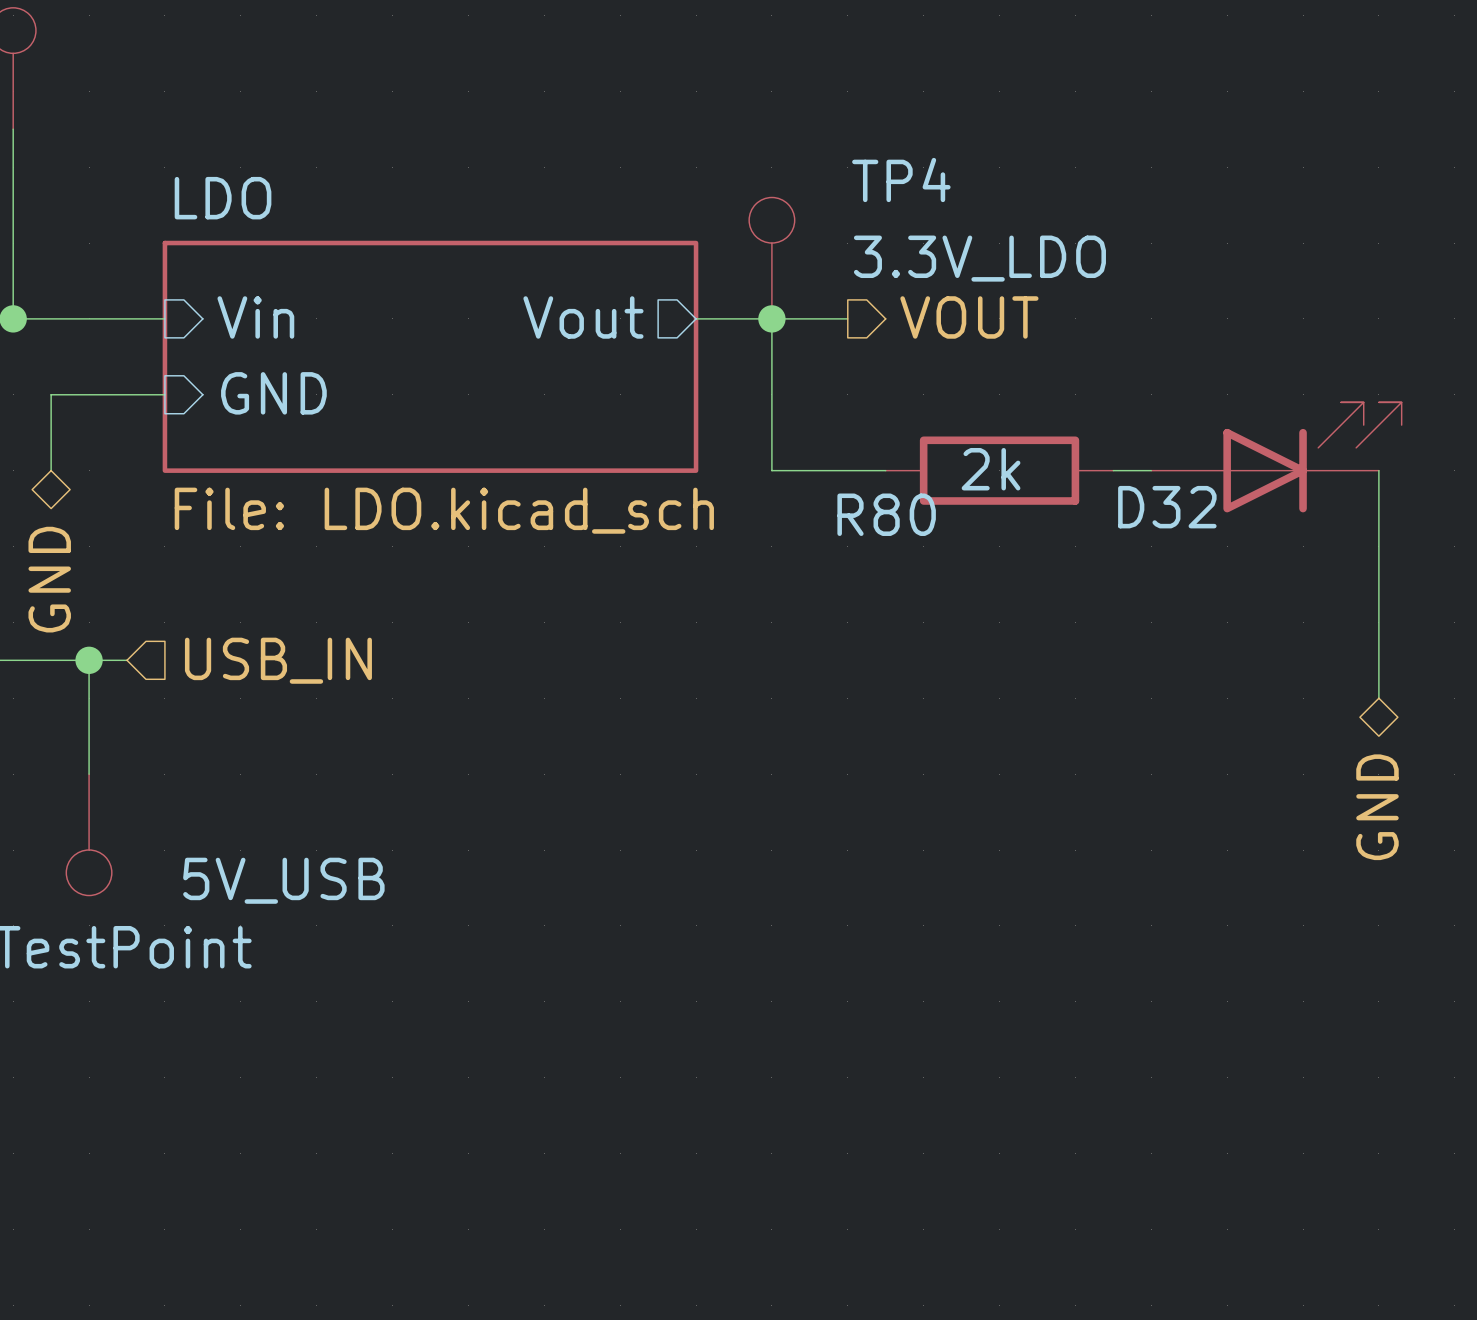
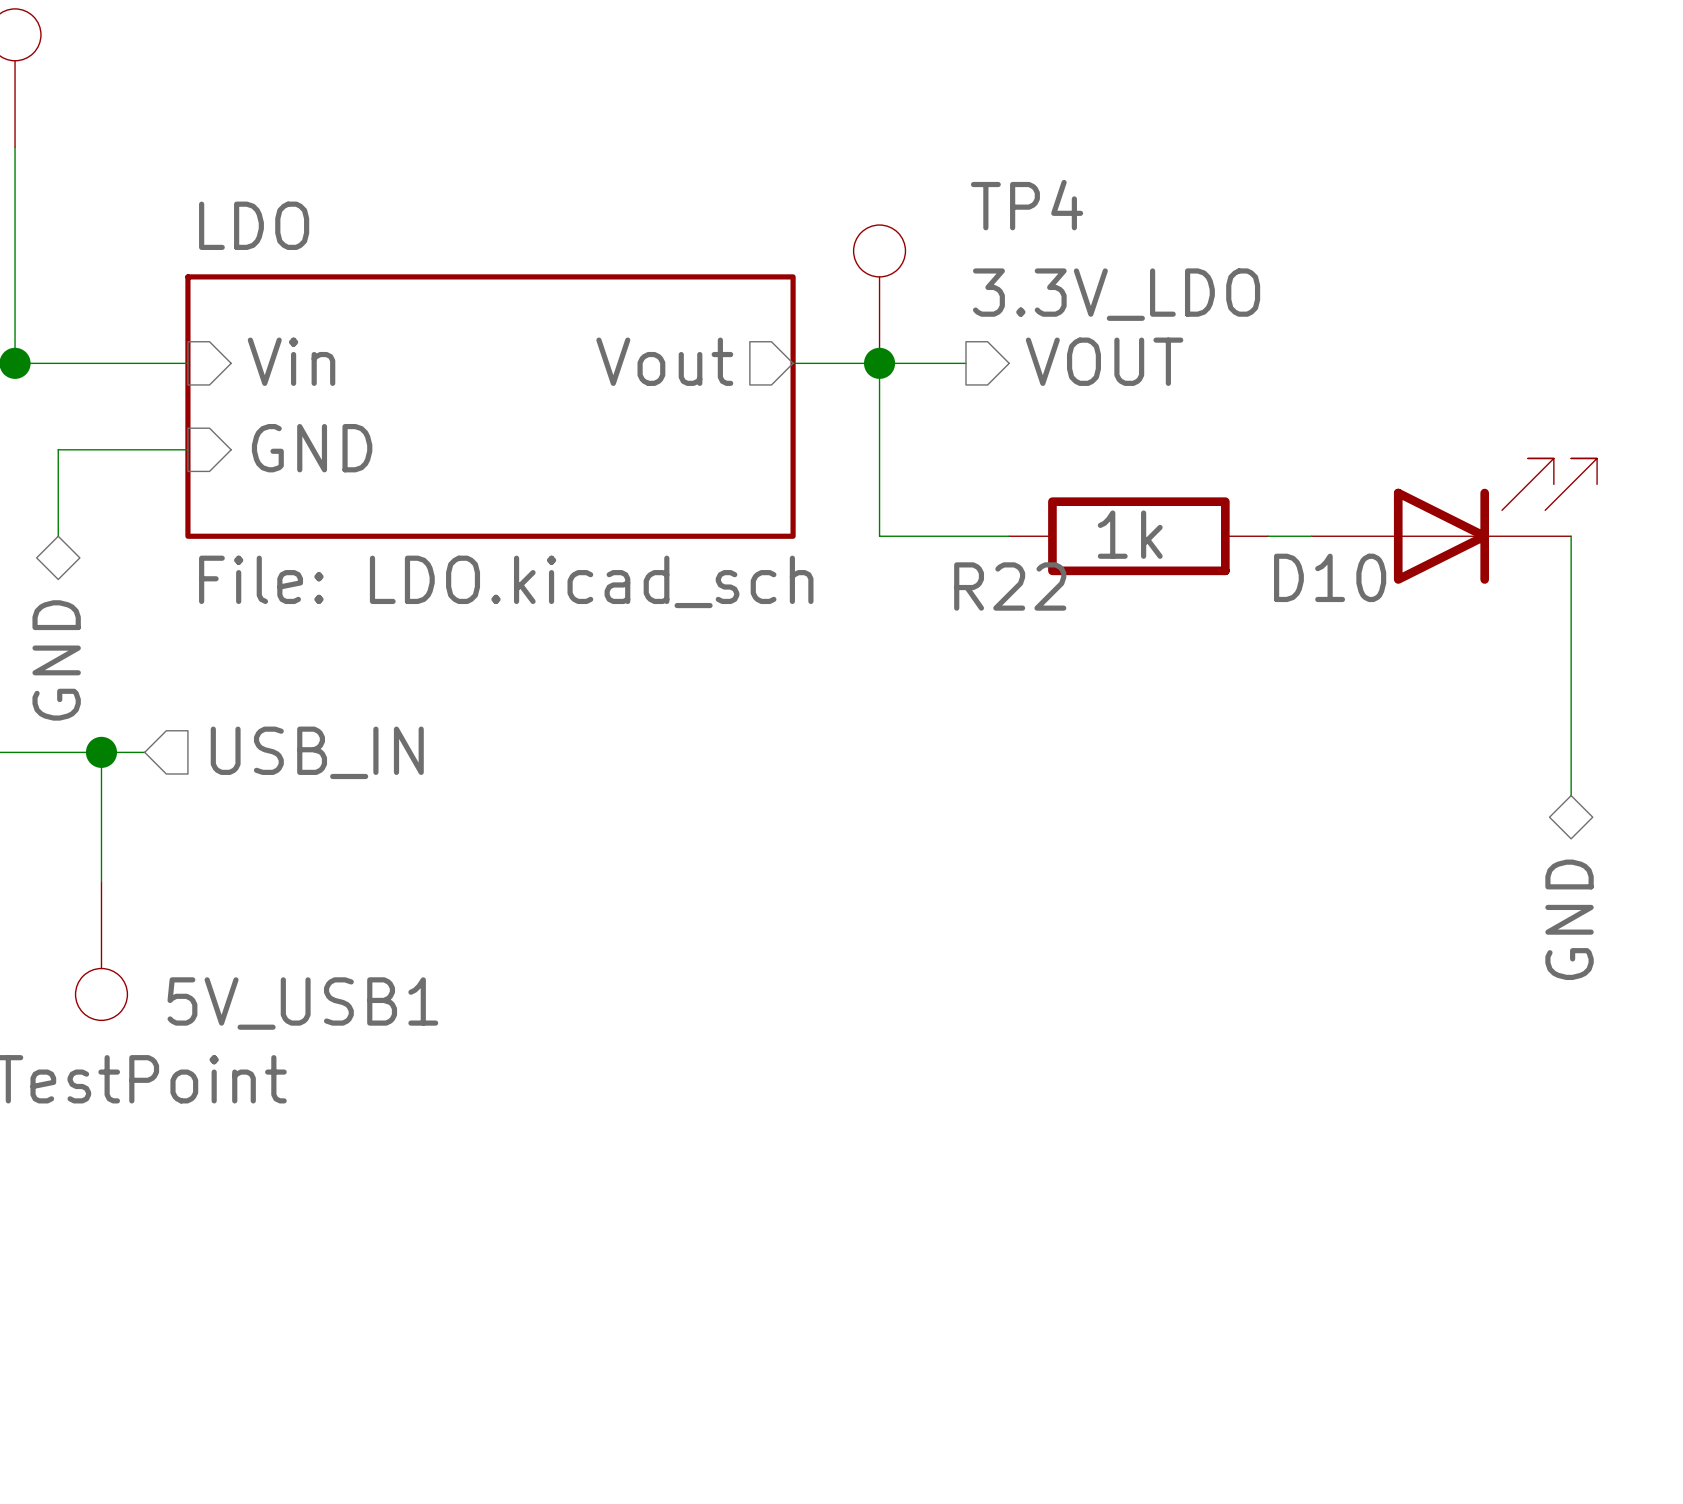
R80 value: 2k (991, 469) -> 1k (1130, 534)
D32 name: D32 (1167, 507) -> D10 (1330, 577)
R80 name: R80 (886, 514) -> R22 (1010, 586)
5V_USB name: 5V_USB (283, 880) -> 5V_USB1 (302, 1003)

